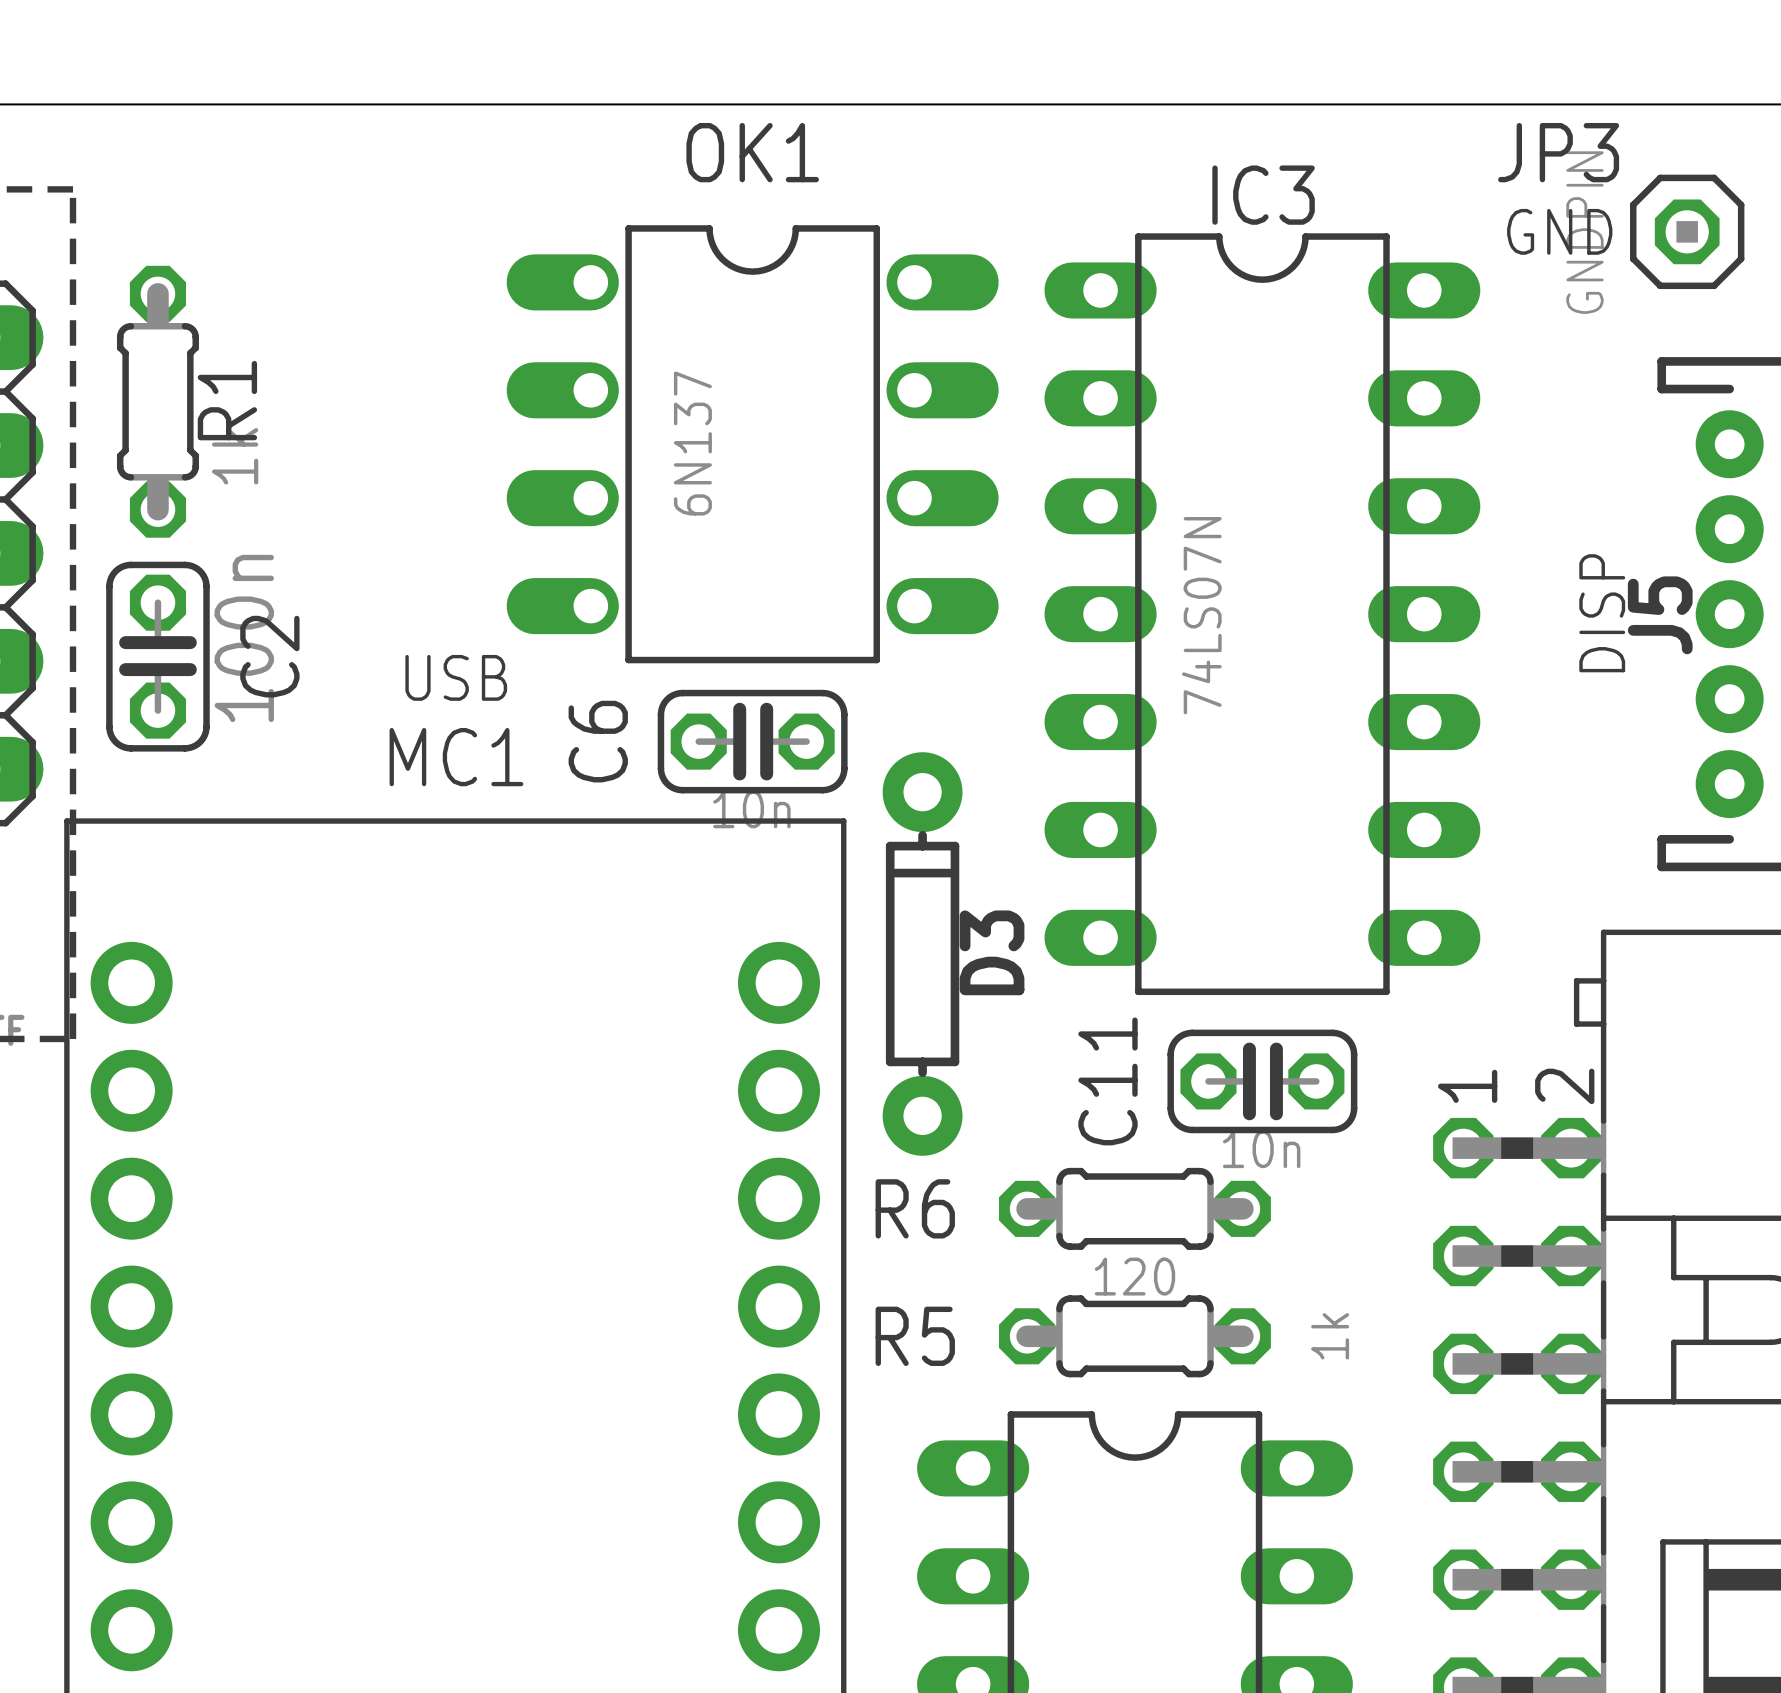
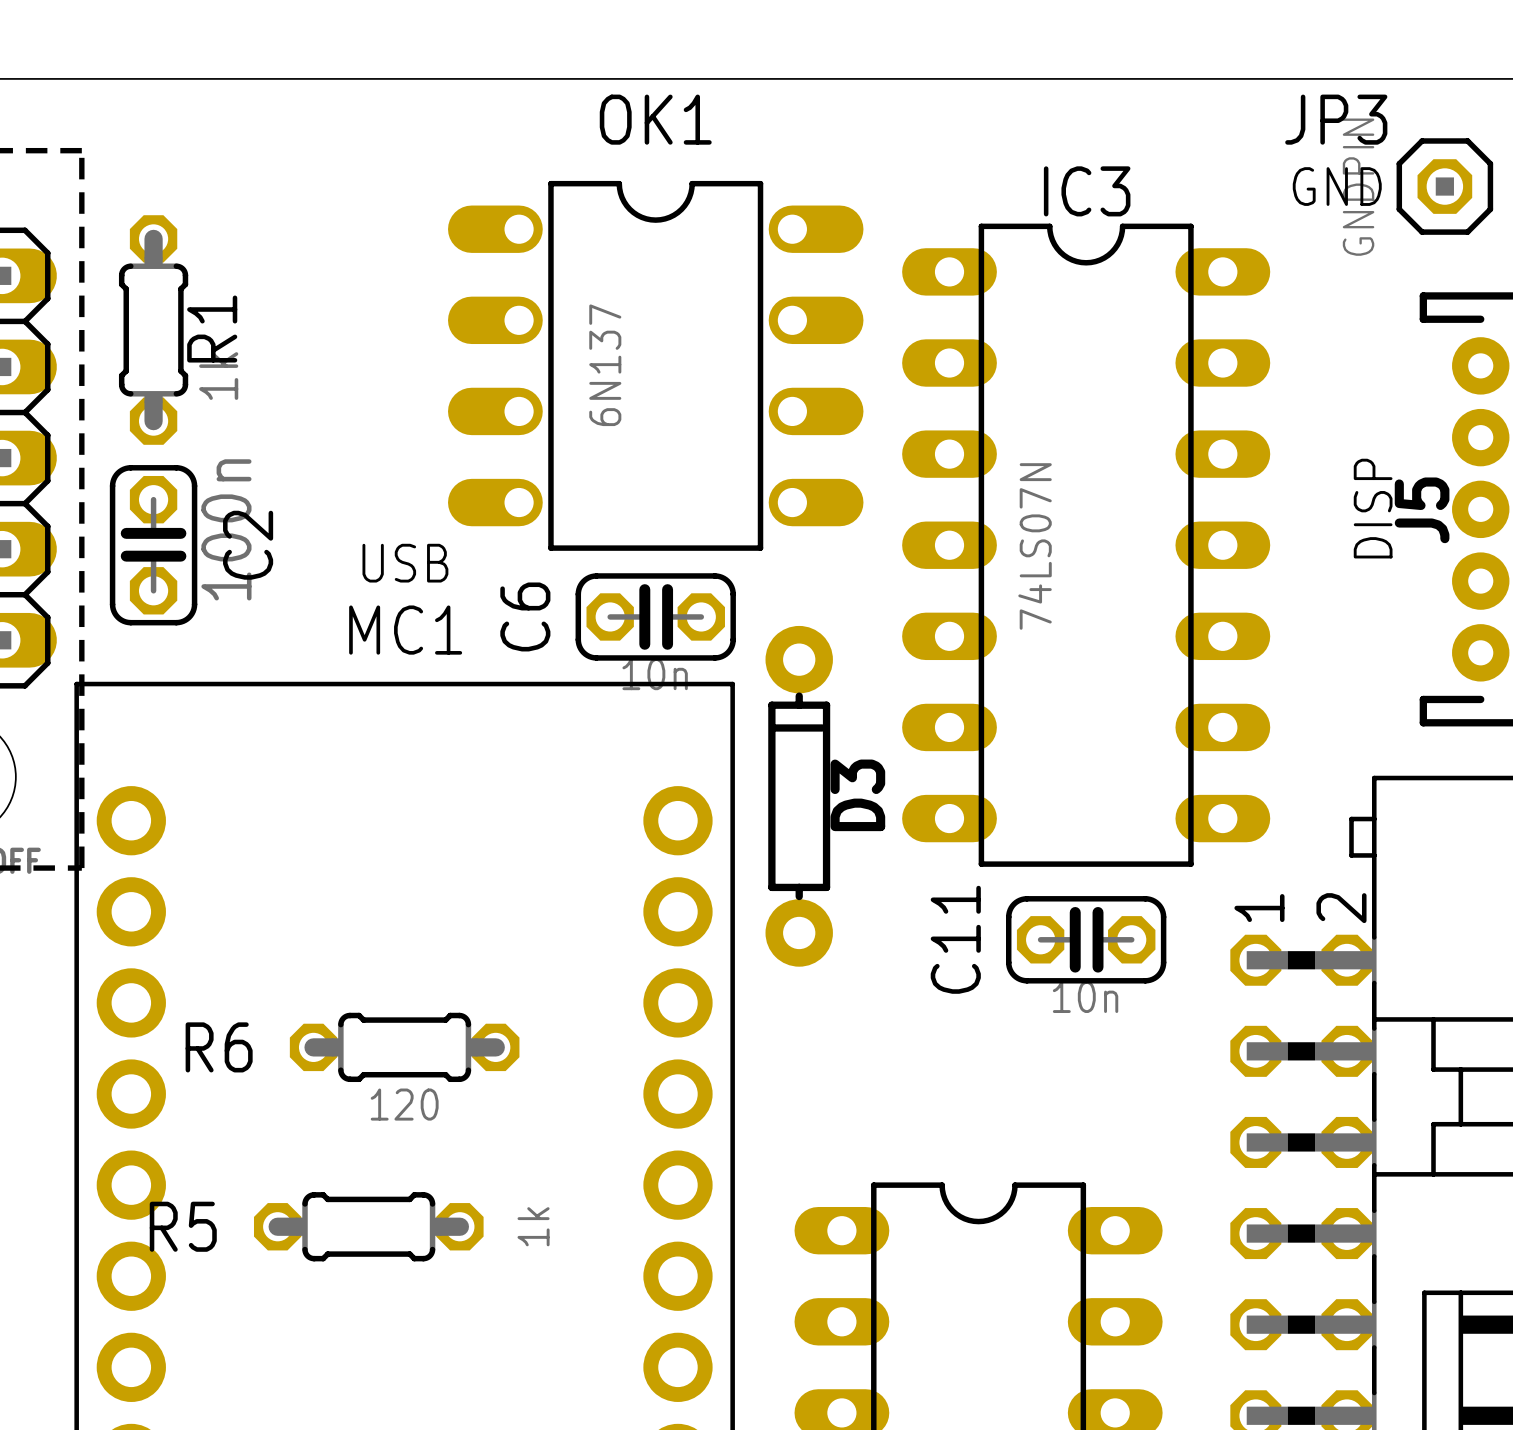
IC3 position: (1262, 614) -> (1086, 545)
C11 position: (1262, 1081) -> (1086, 939)
R6 position: (1134, 1208) -> (404, 1047)
R5 position: (1134, 1336) -> (368, 1226)

